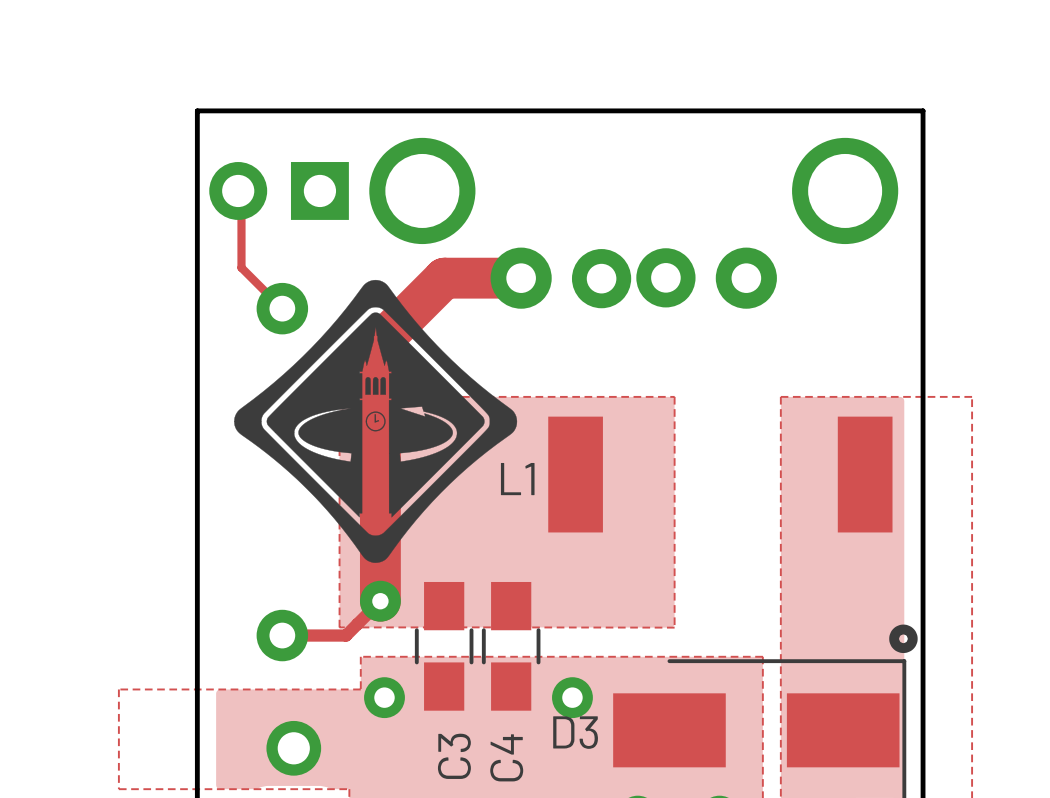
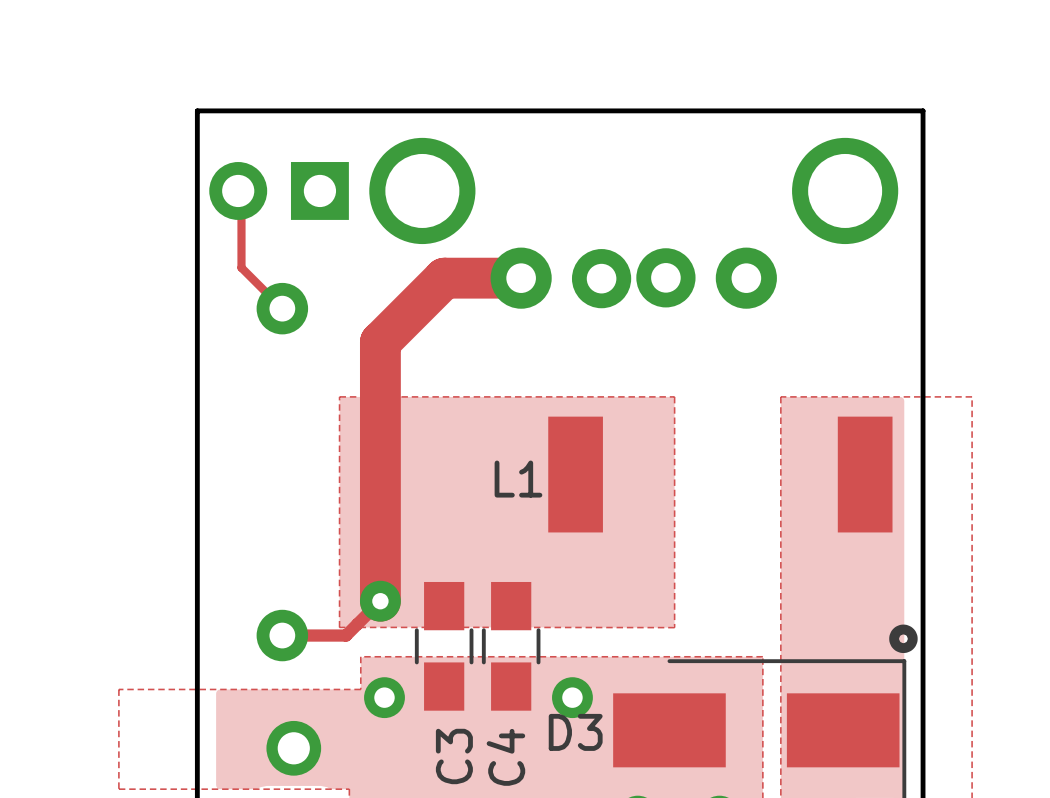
drawing: [234, 279, 518, 563] -> none

